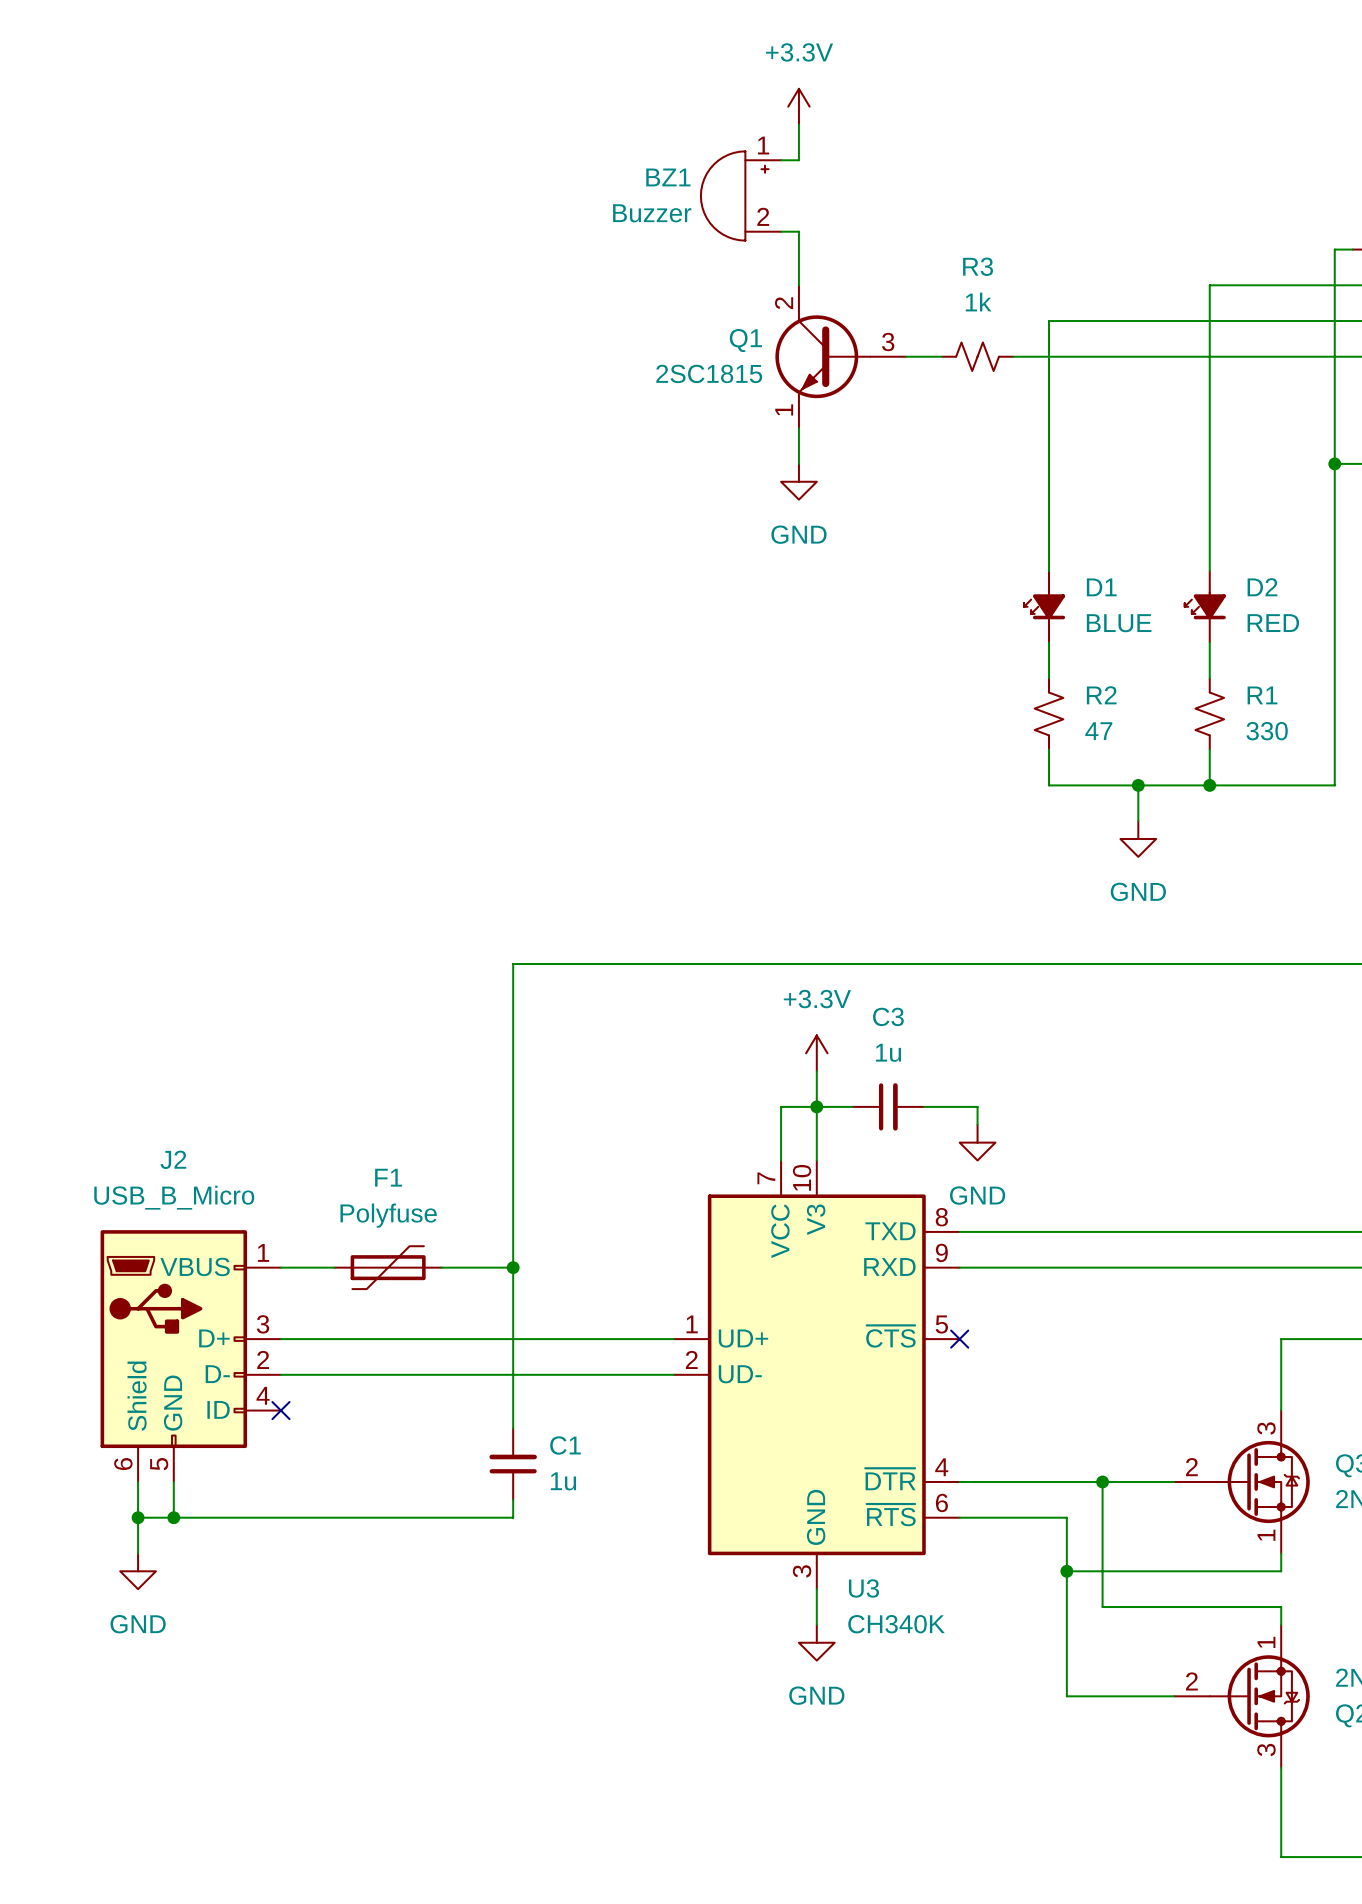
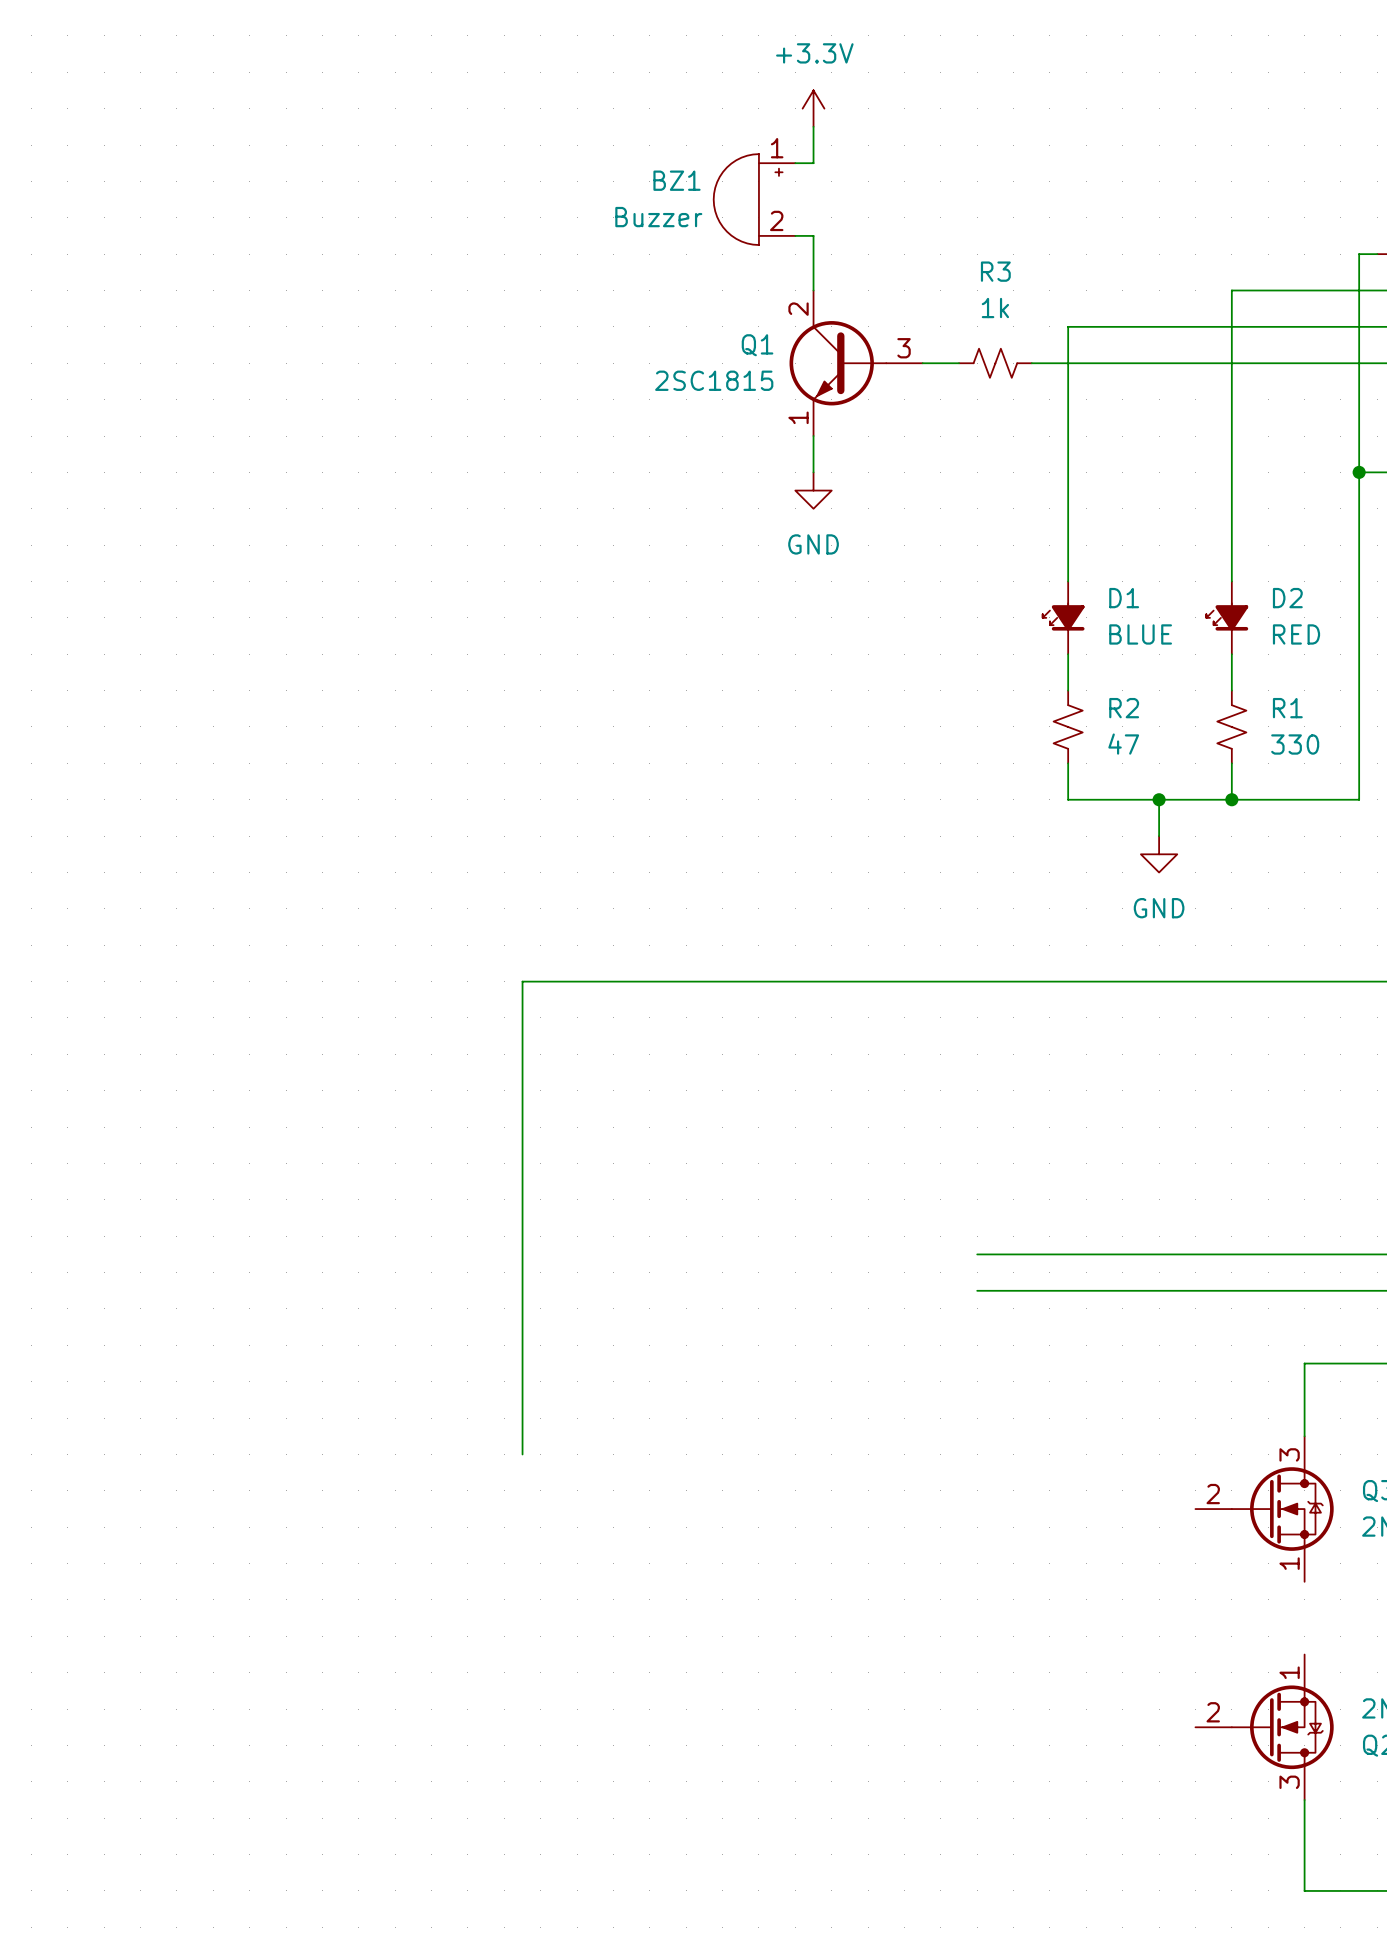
power symbol: +3.3V (816, 1053) -> none
wire: (816, 1071) (816, 1160) -> none
junction: (816, 1106) -> none
wire: (852, 1106) (781, 1106) (781, 1160) -> none
C3: 1u (888, 1106) -> none
wire: (923, 1106) (977, 1106) (977, 1124) -> none
power symbol: GND (977, 1142) -> none
wire: (280, 1267) (334, 1267) -> none
F1: Polyfuse (388, 1267) -> none
wire: (441, 1267) (513, 1267) -> none
junction: (513, 1267) -> none
wire: (280, 1339) (673, 1339) -> none
no-connect mark: (959, 1339) -> none
J2: USB_B_Micro (190, 1356) -> none
wire: (280, 1374) (673, 1374) -> none
U3: CH340K (816, 1374) -> none
no-connect mark: (280, 1410) -> none
C1: 1u (513, 1464) -> none
wire: (138, 1481) (138, 1553) -> none
wire: (173, 1481) (173, 1517) -> none
wire: (959, 1481) (1174, 1481) -> none
wire: (1102, 1481) (1102, 1607) (1281, 1607) (1281, 1624) -> none
junction: (1102, 1481) -> none
wire: (513, 1499) (513, 1517) (138, 1517) -> none
junction: (138, 1517) -> none
junction: (173, 1517) -> none
wire: (959, 1517) (1066, 1517) (1066, 1696) (1174, 1696) -> none
wire: (1281, 1553) (1281, 1571) (1066, 1571) -> none
power symbol: GND (138, 1571) -> none
junction: (1066, 1571) -> none
wire: (816, 1589) (816, 1624) -> none
power symbol: GND (816, 1642) -> none

